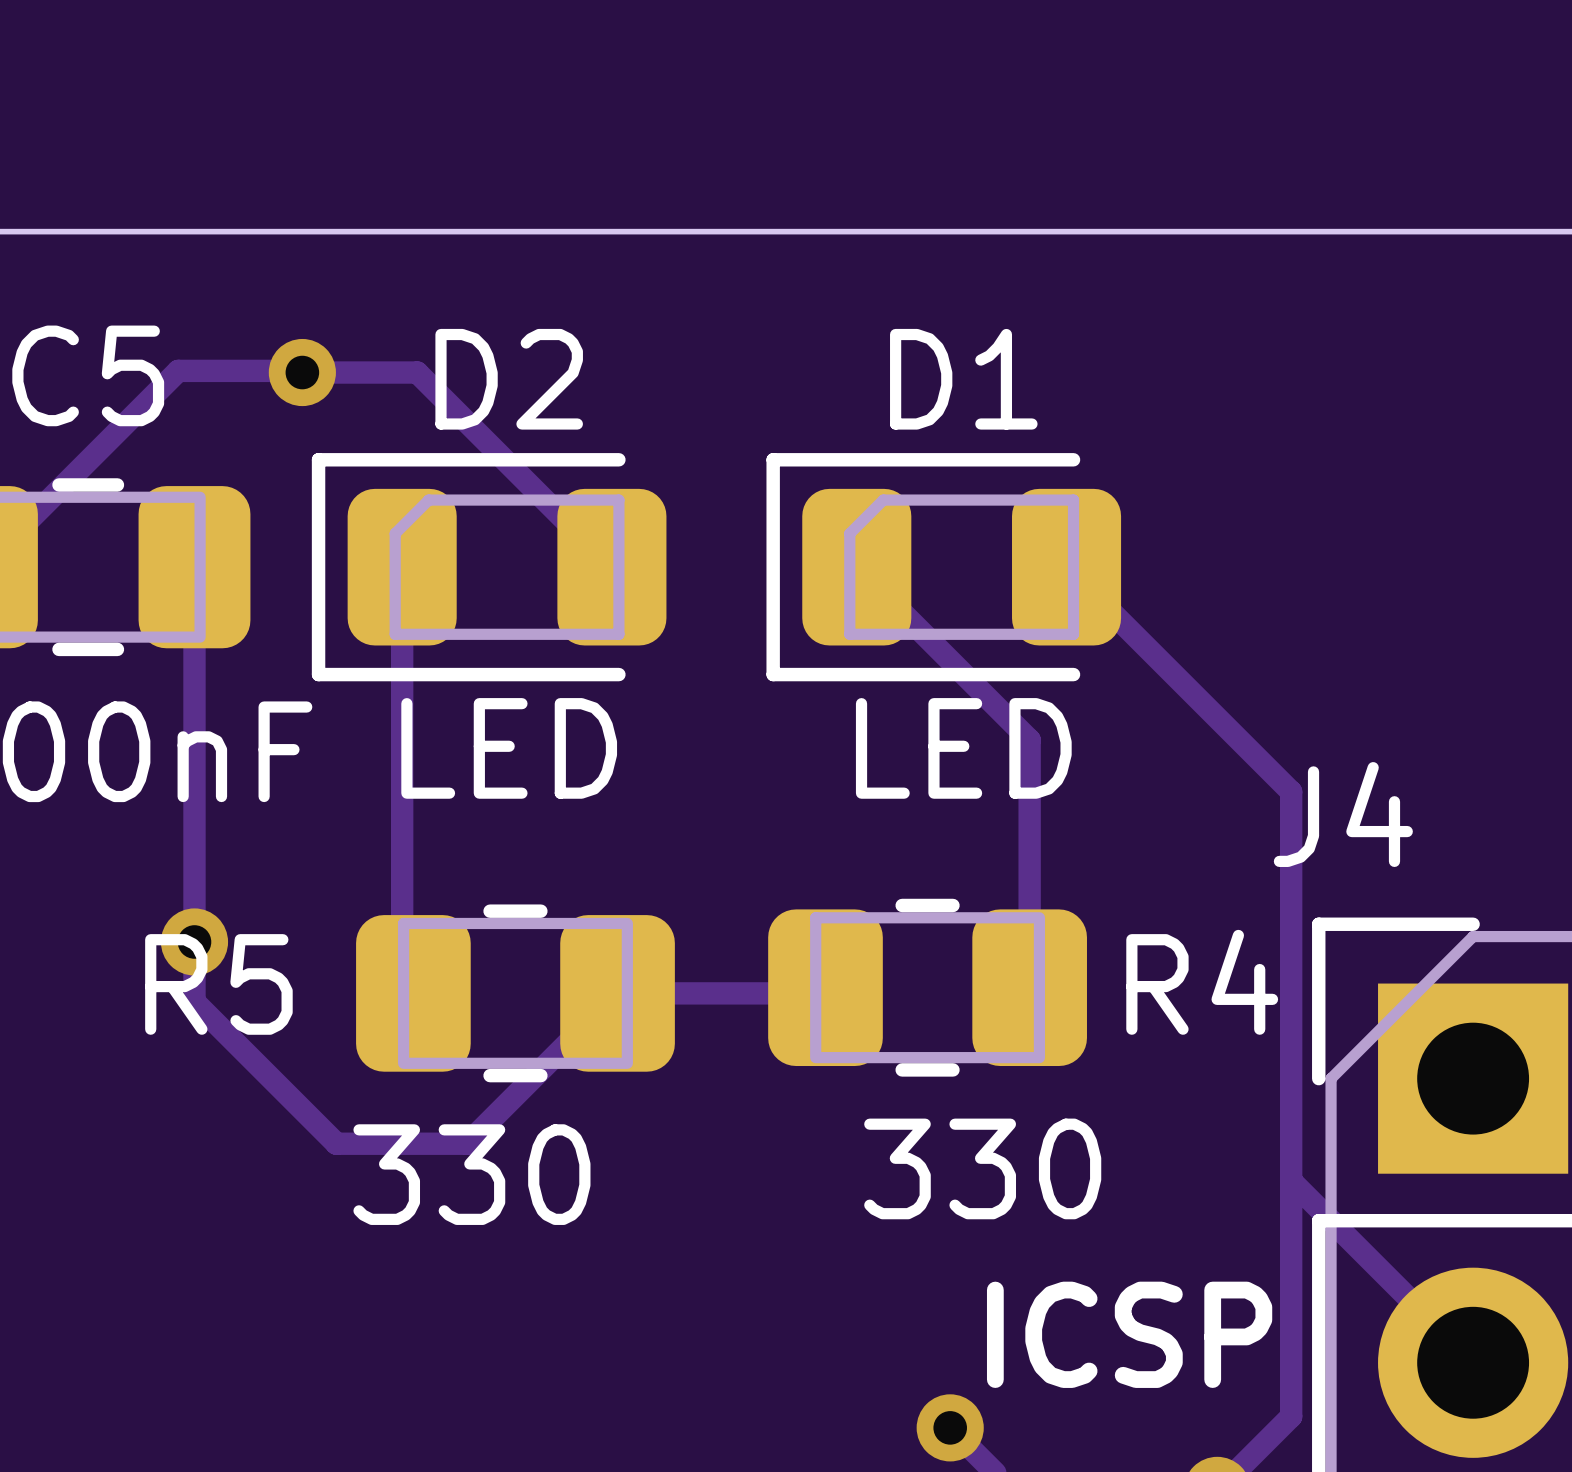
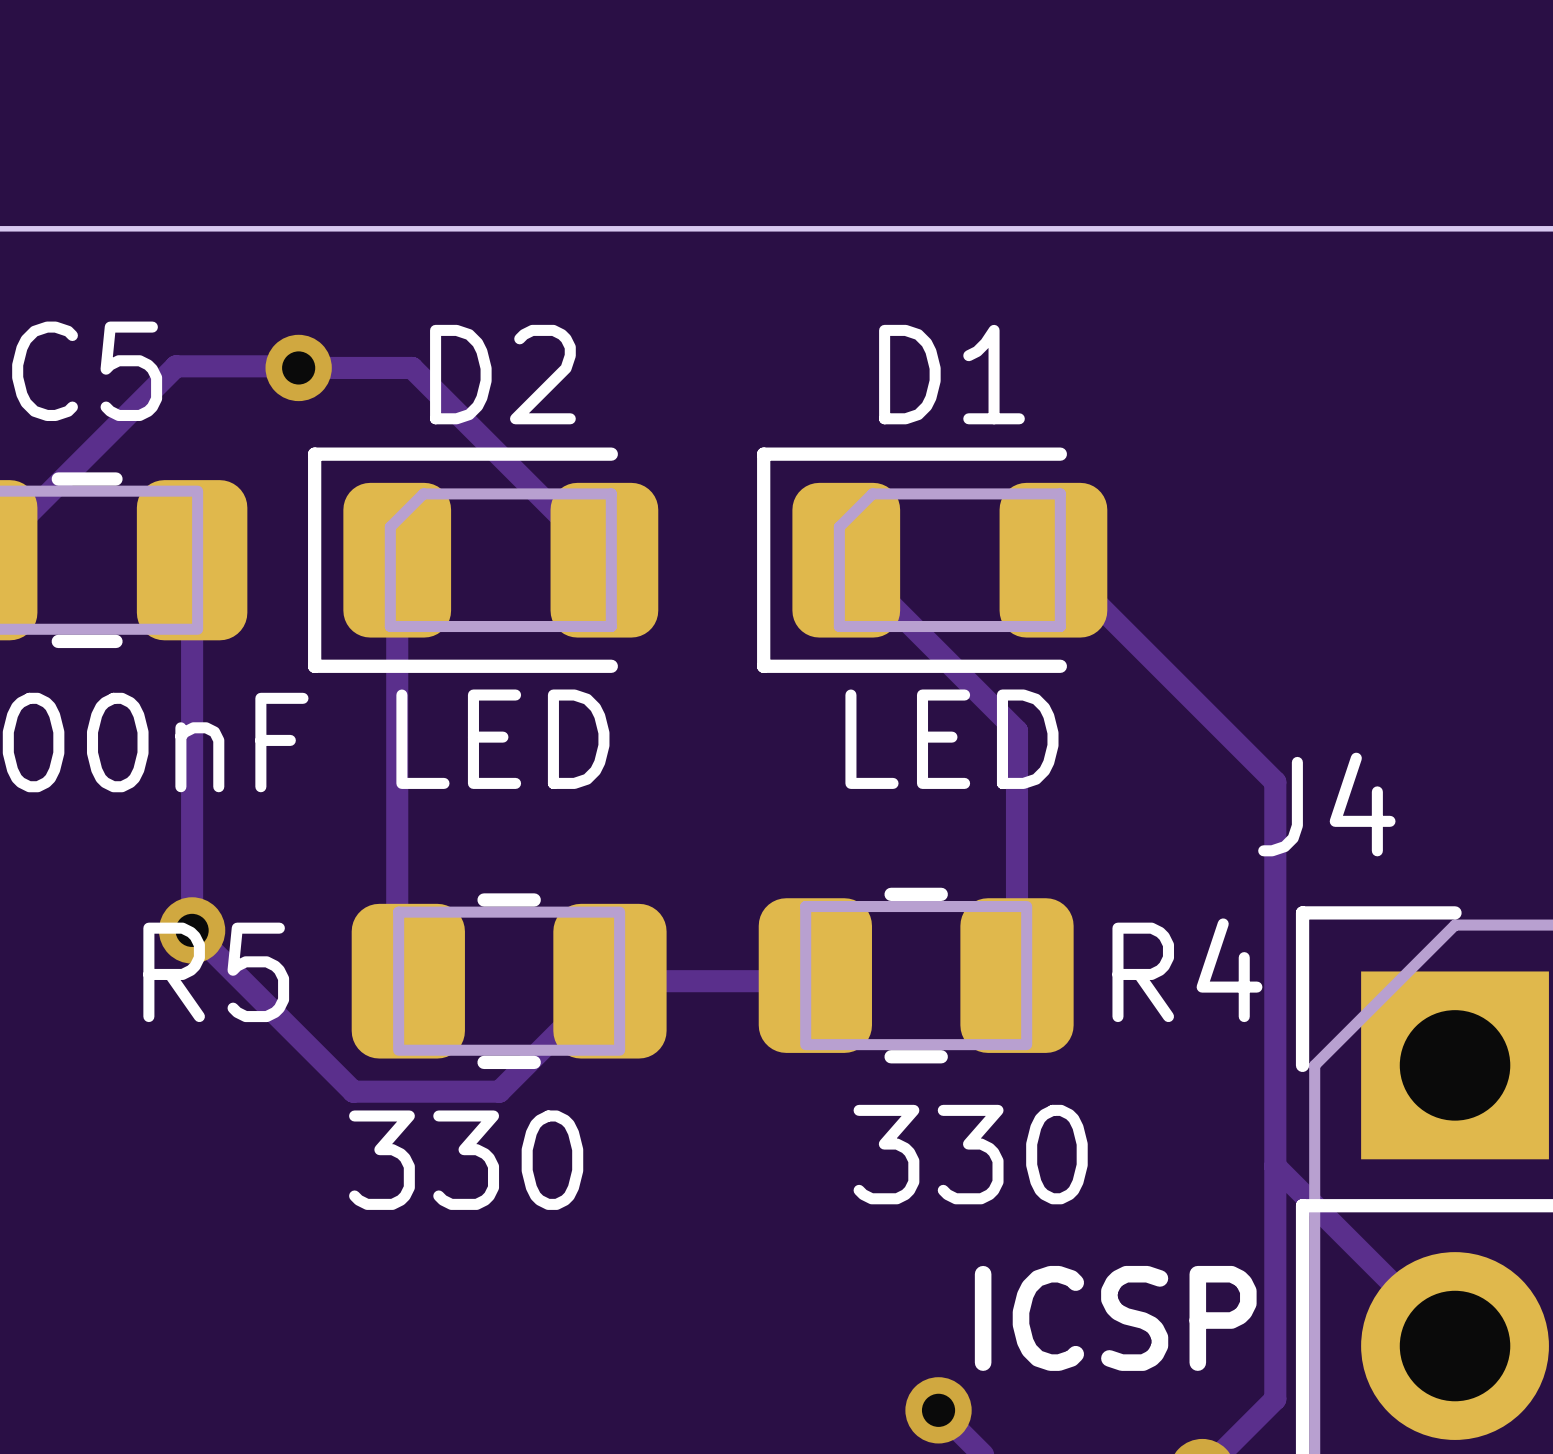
track: (194, 941) (194, 1001) (336, 1143) (467, 1143) (505, 1105) -> (192, 930) (353, 1091) (499, 1091)

